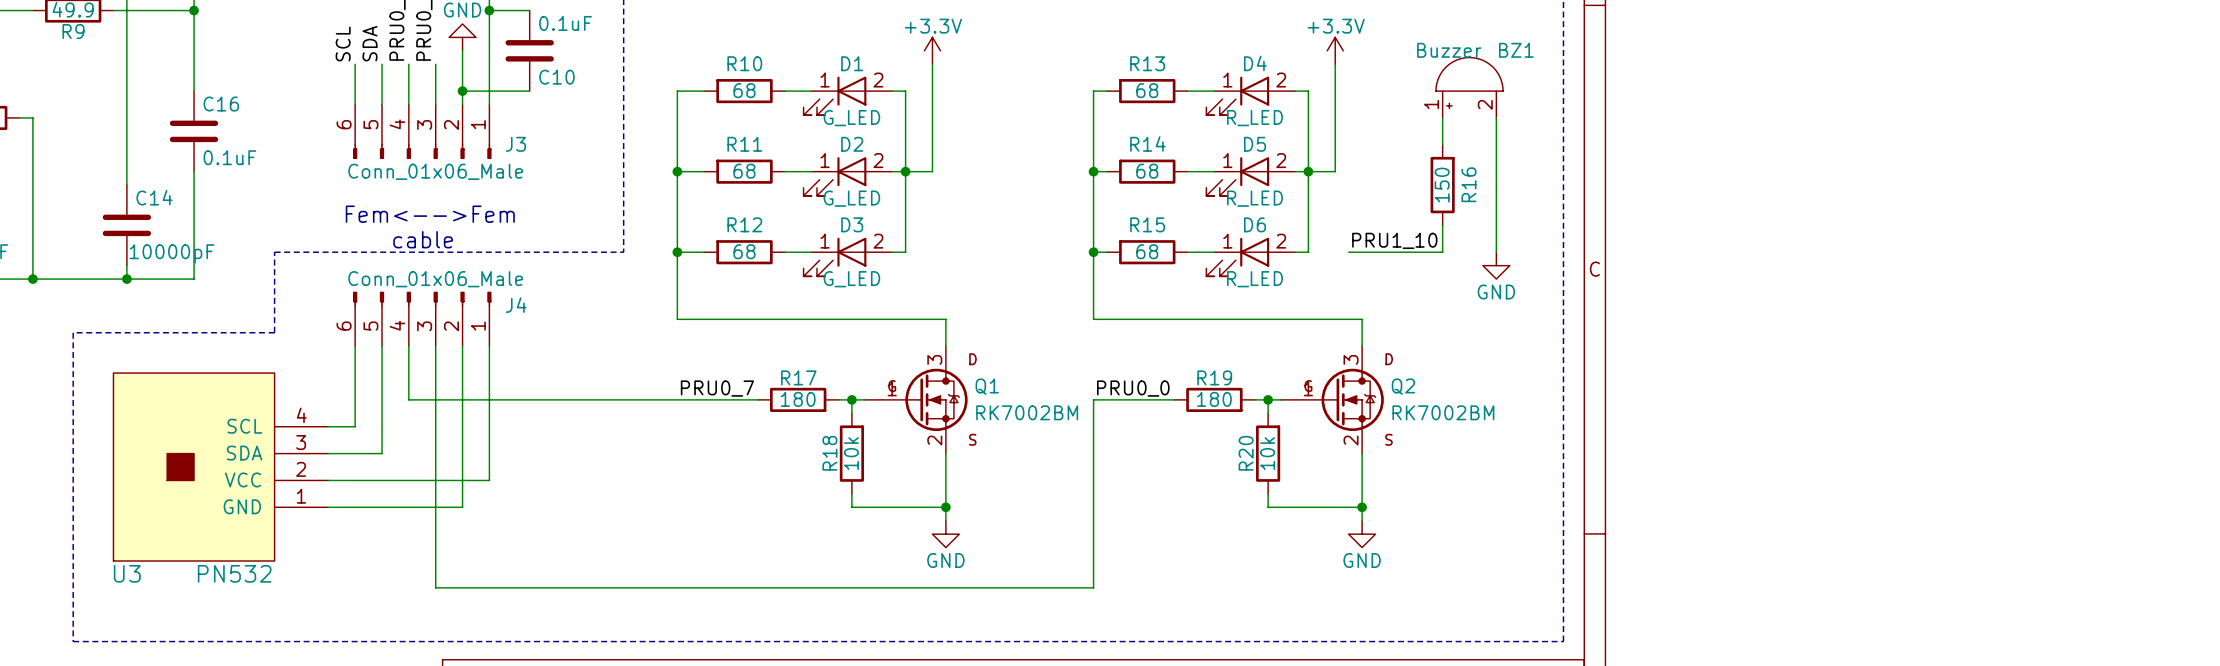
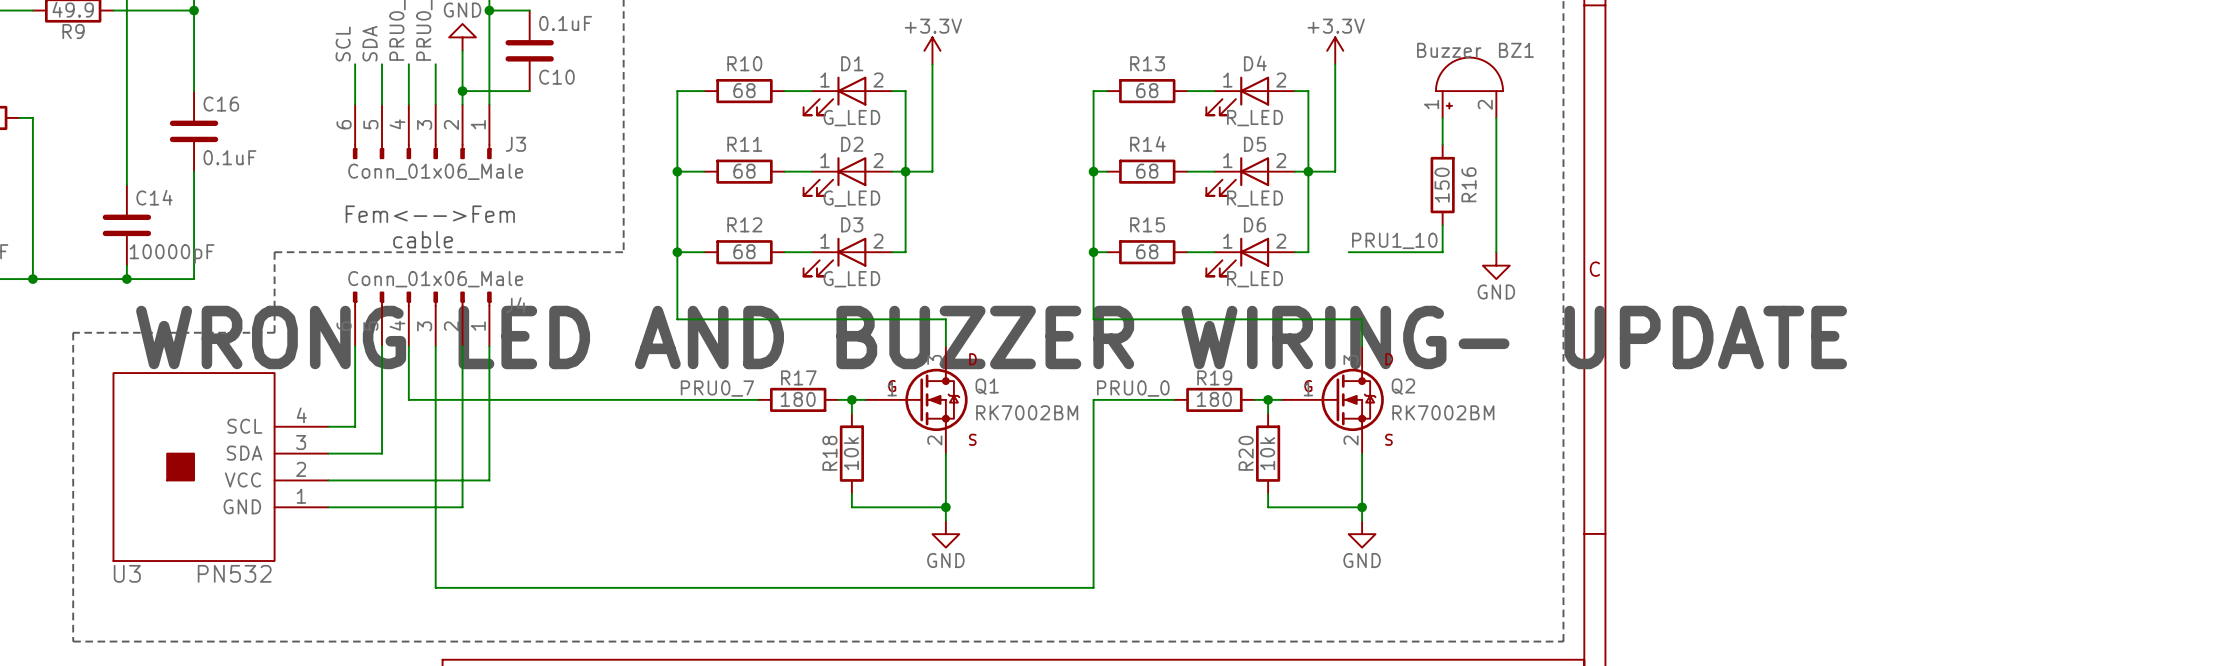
text: none -> WRONG LED AND BUZZER WIRING- UPDATE (991, 337)

